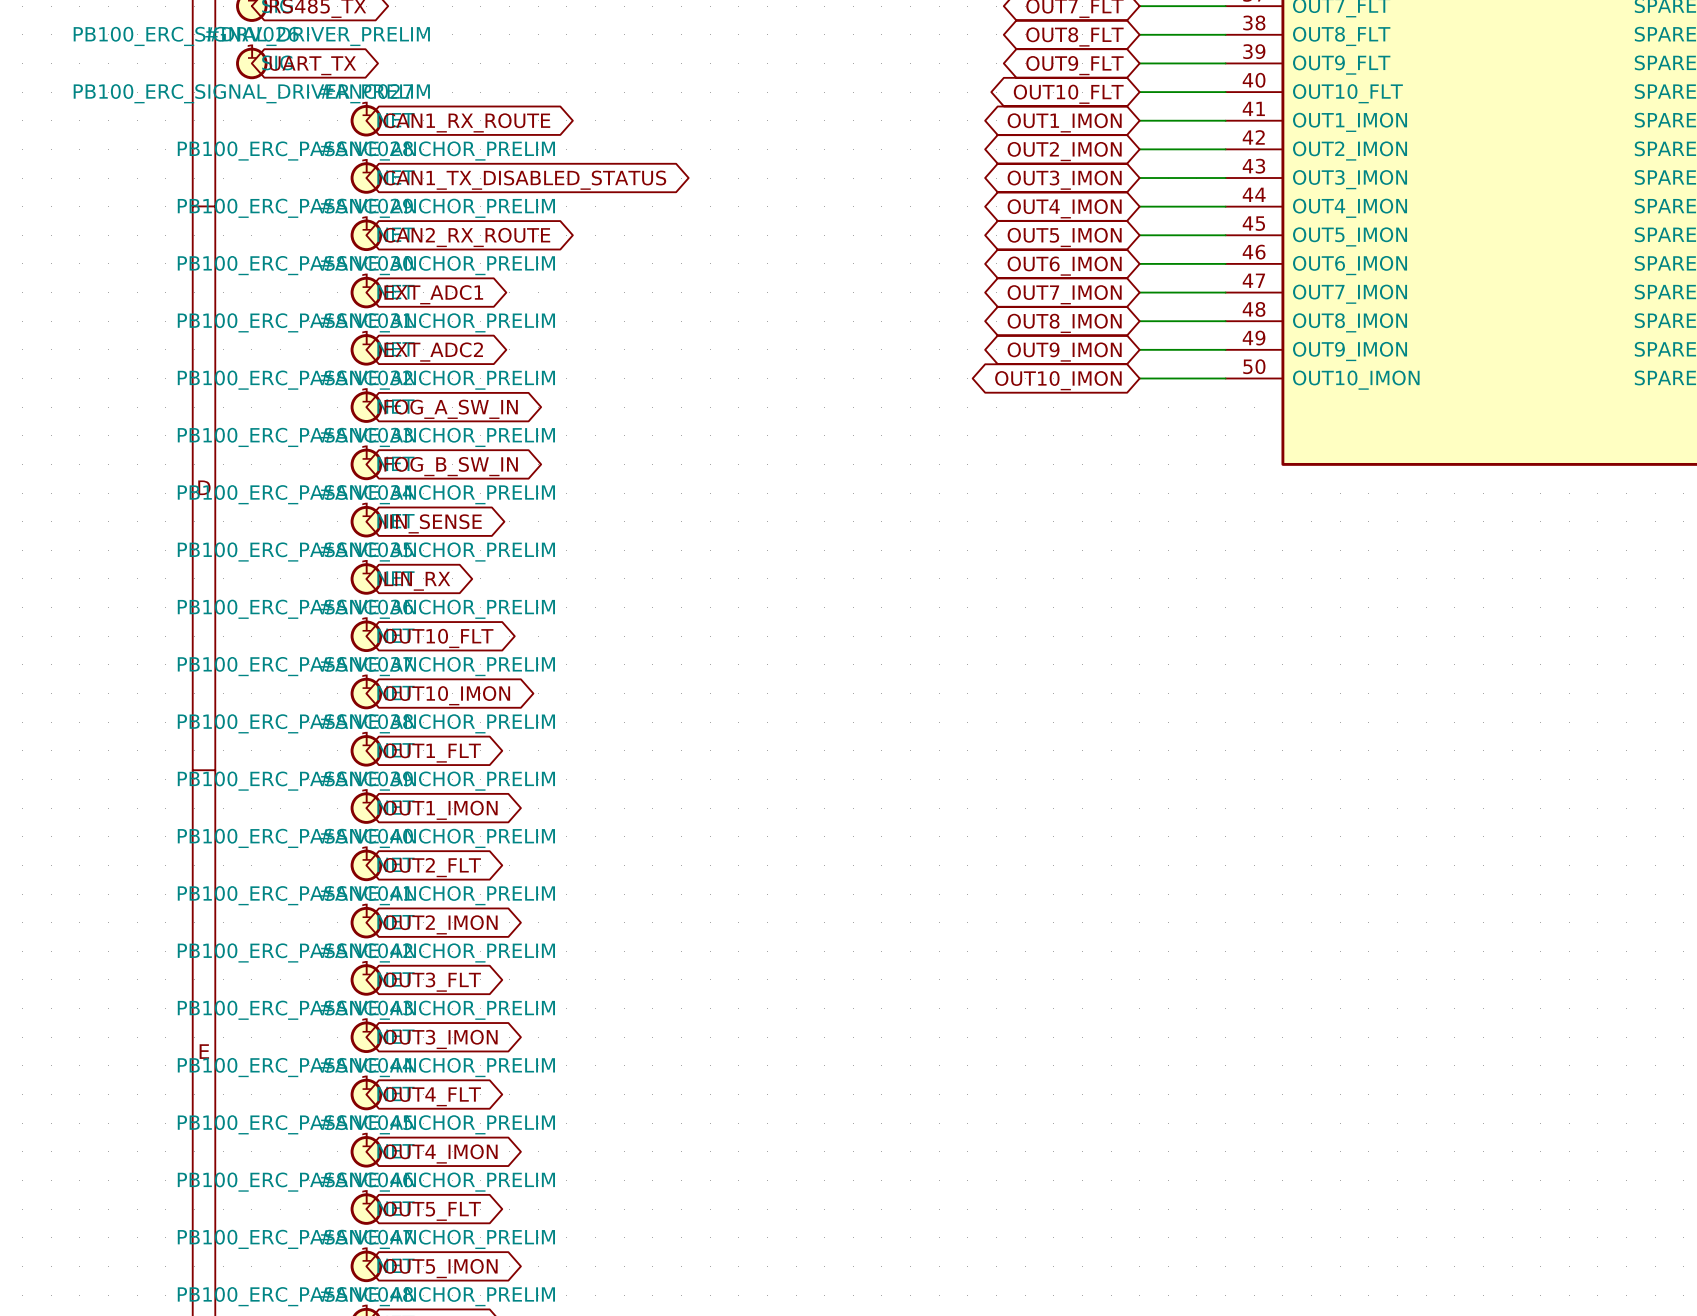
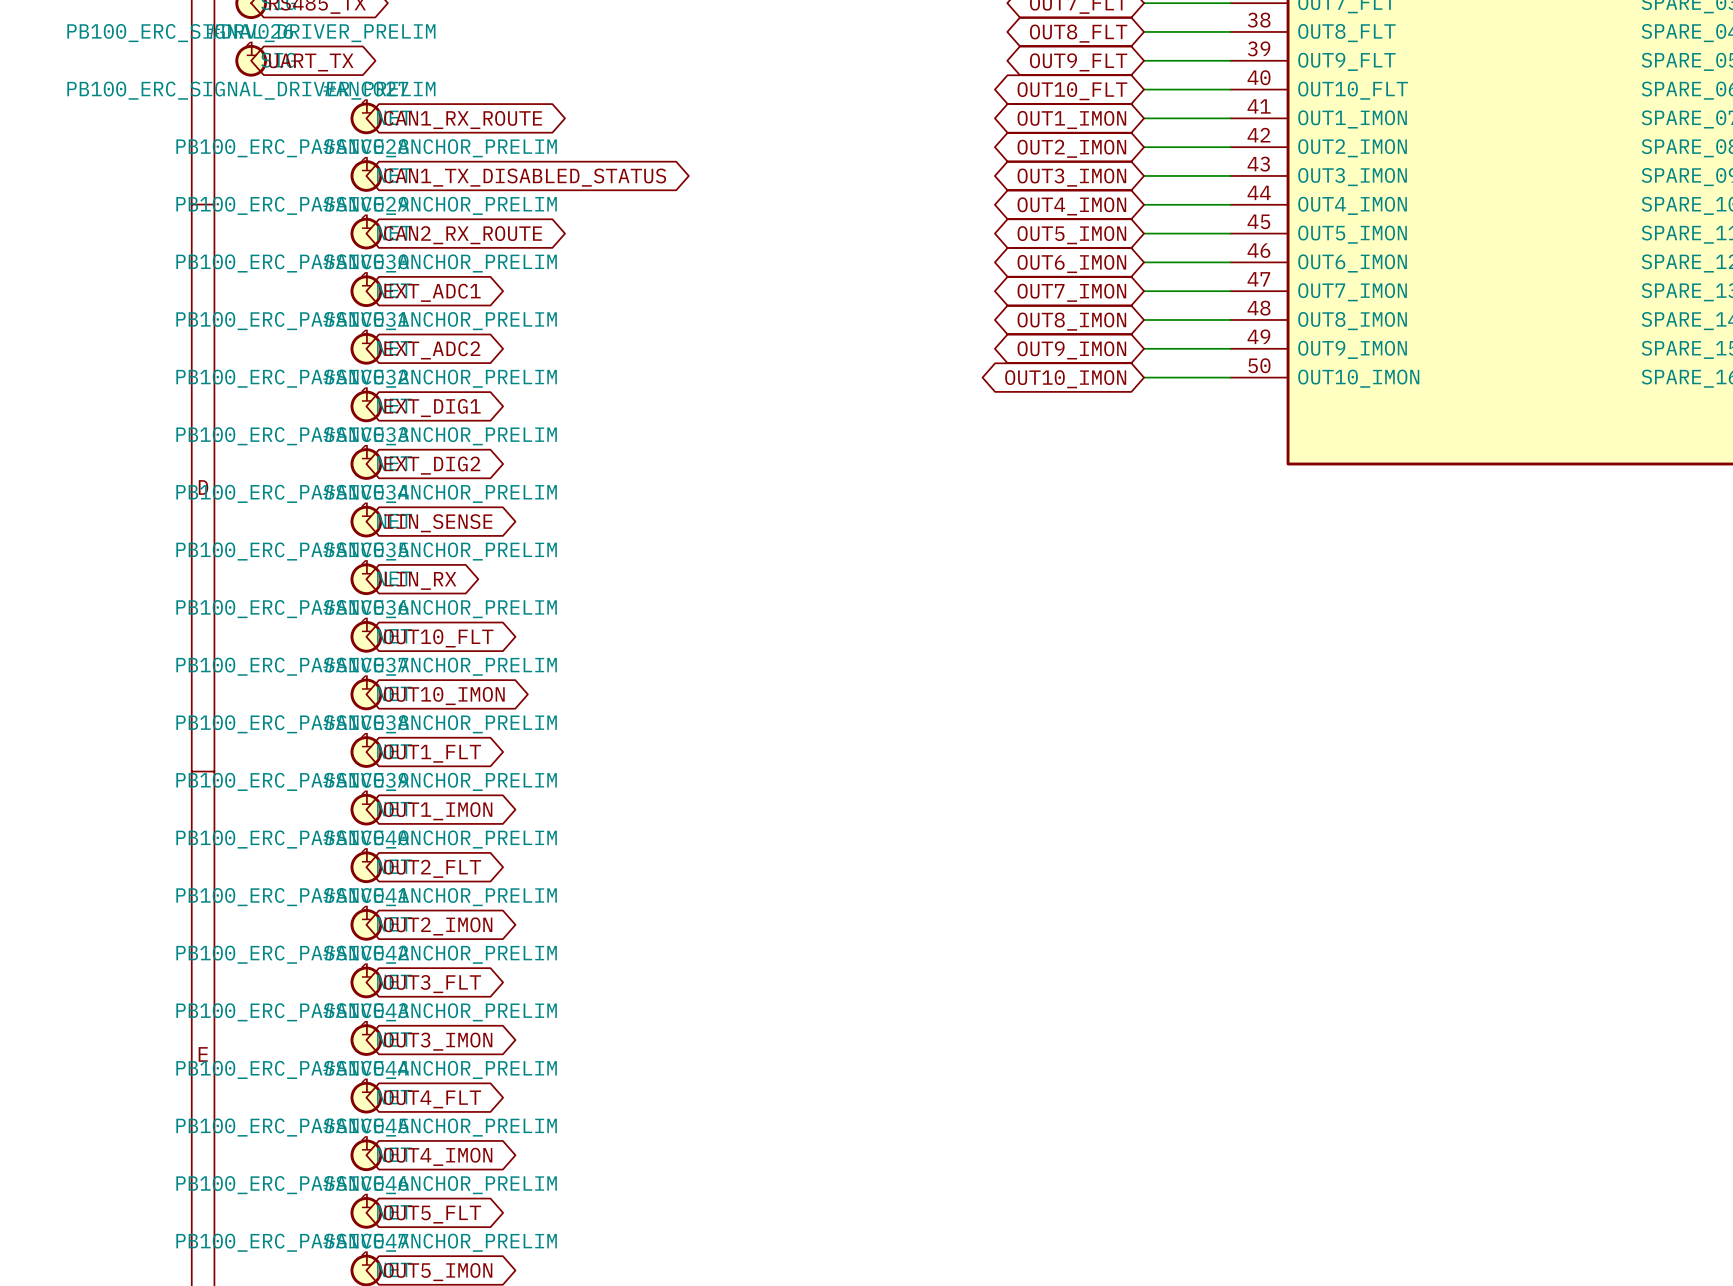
global label: FOG_A_SW_IN (451, 409) -> EXT_DIG1 (432, 408)
global label: FOG_B_SW_IN (451, 466) -> EXT_DIG2 (432, 465)

